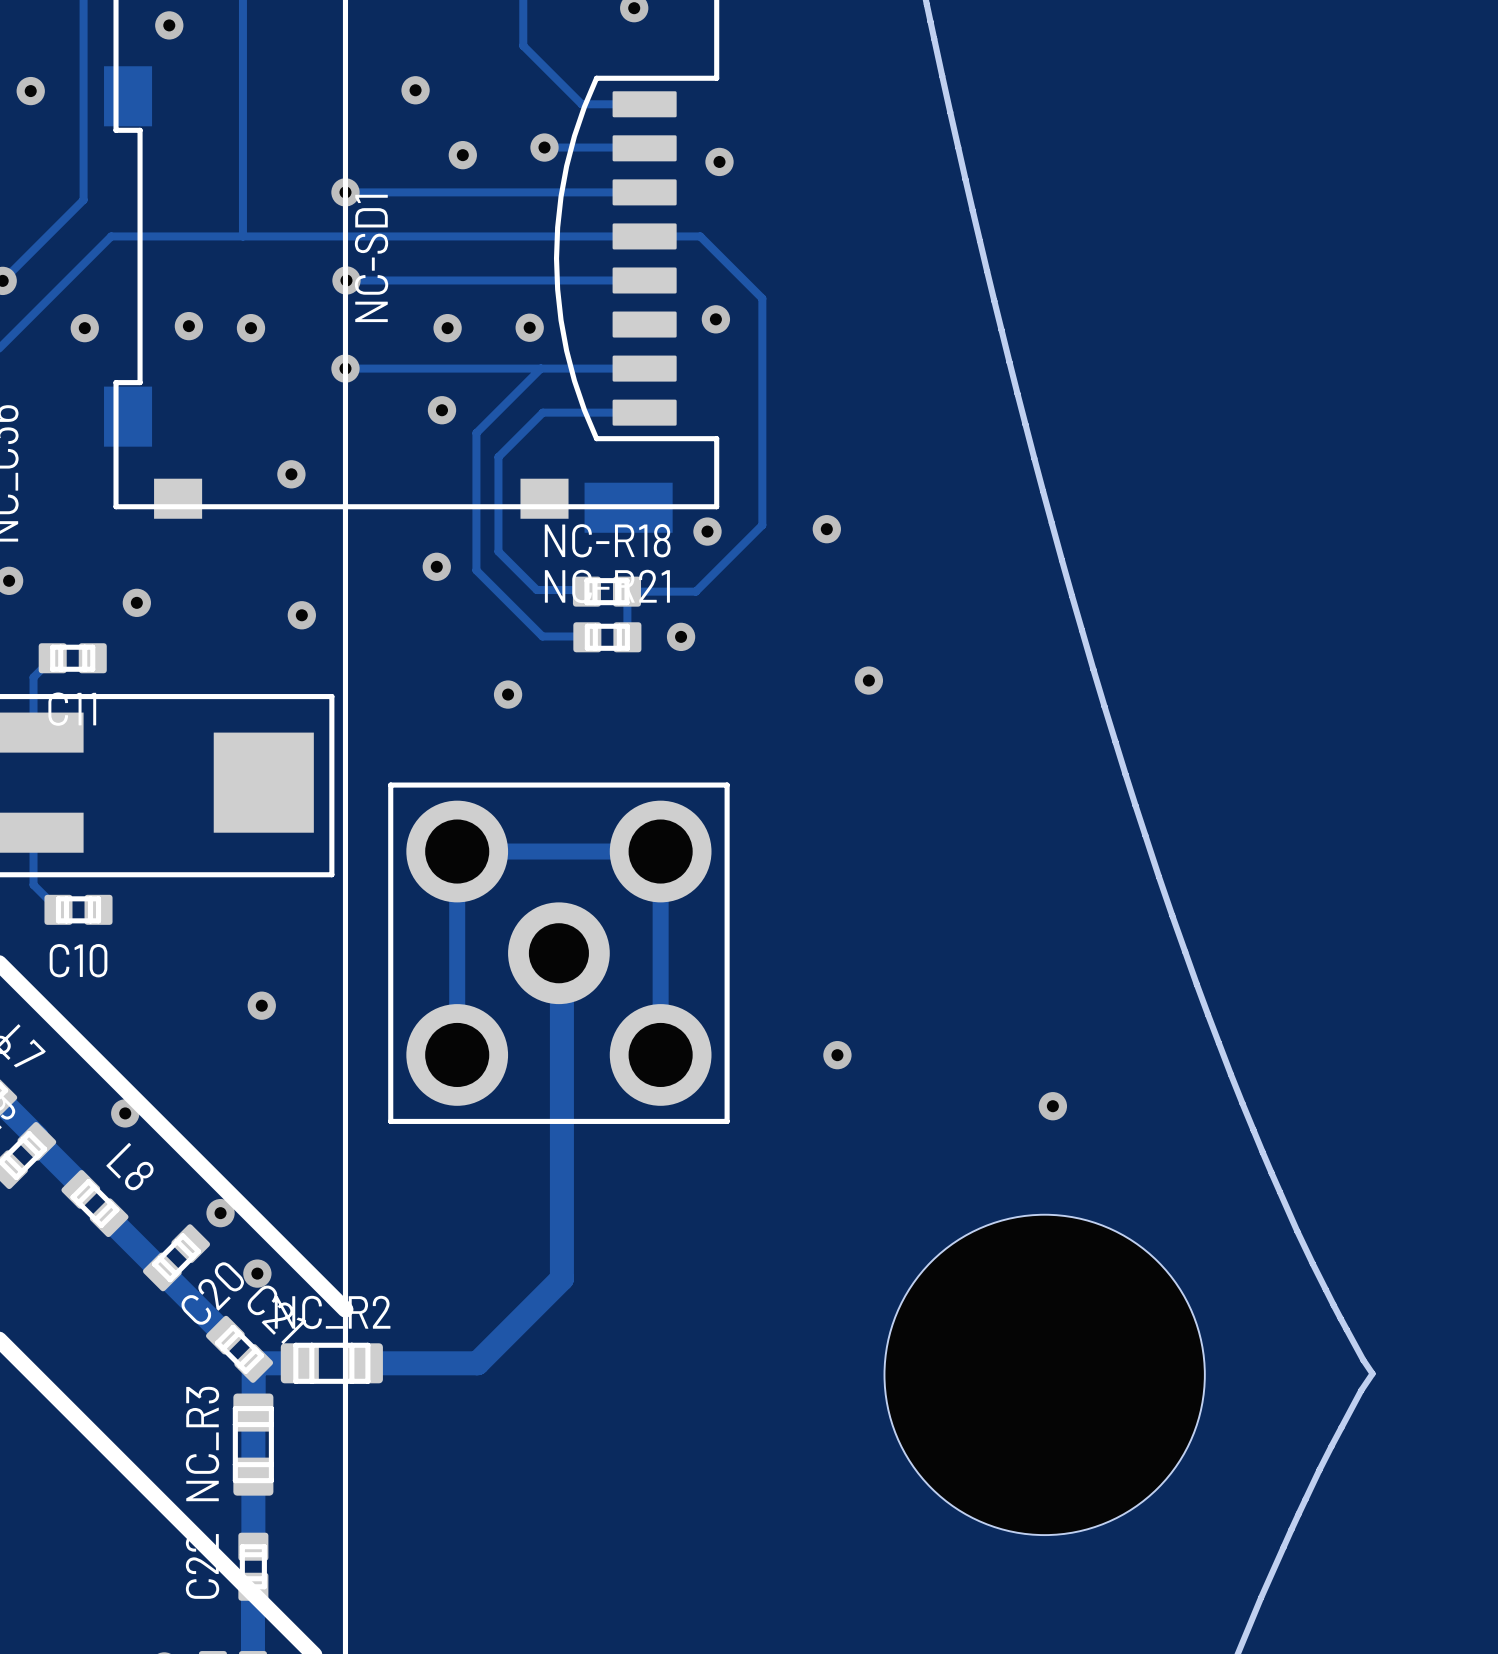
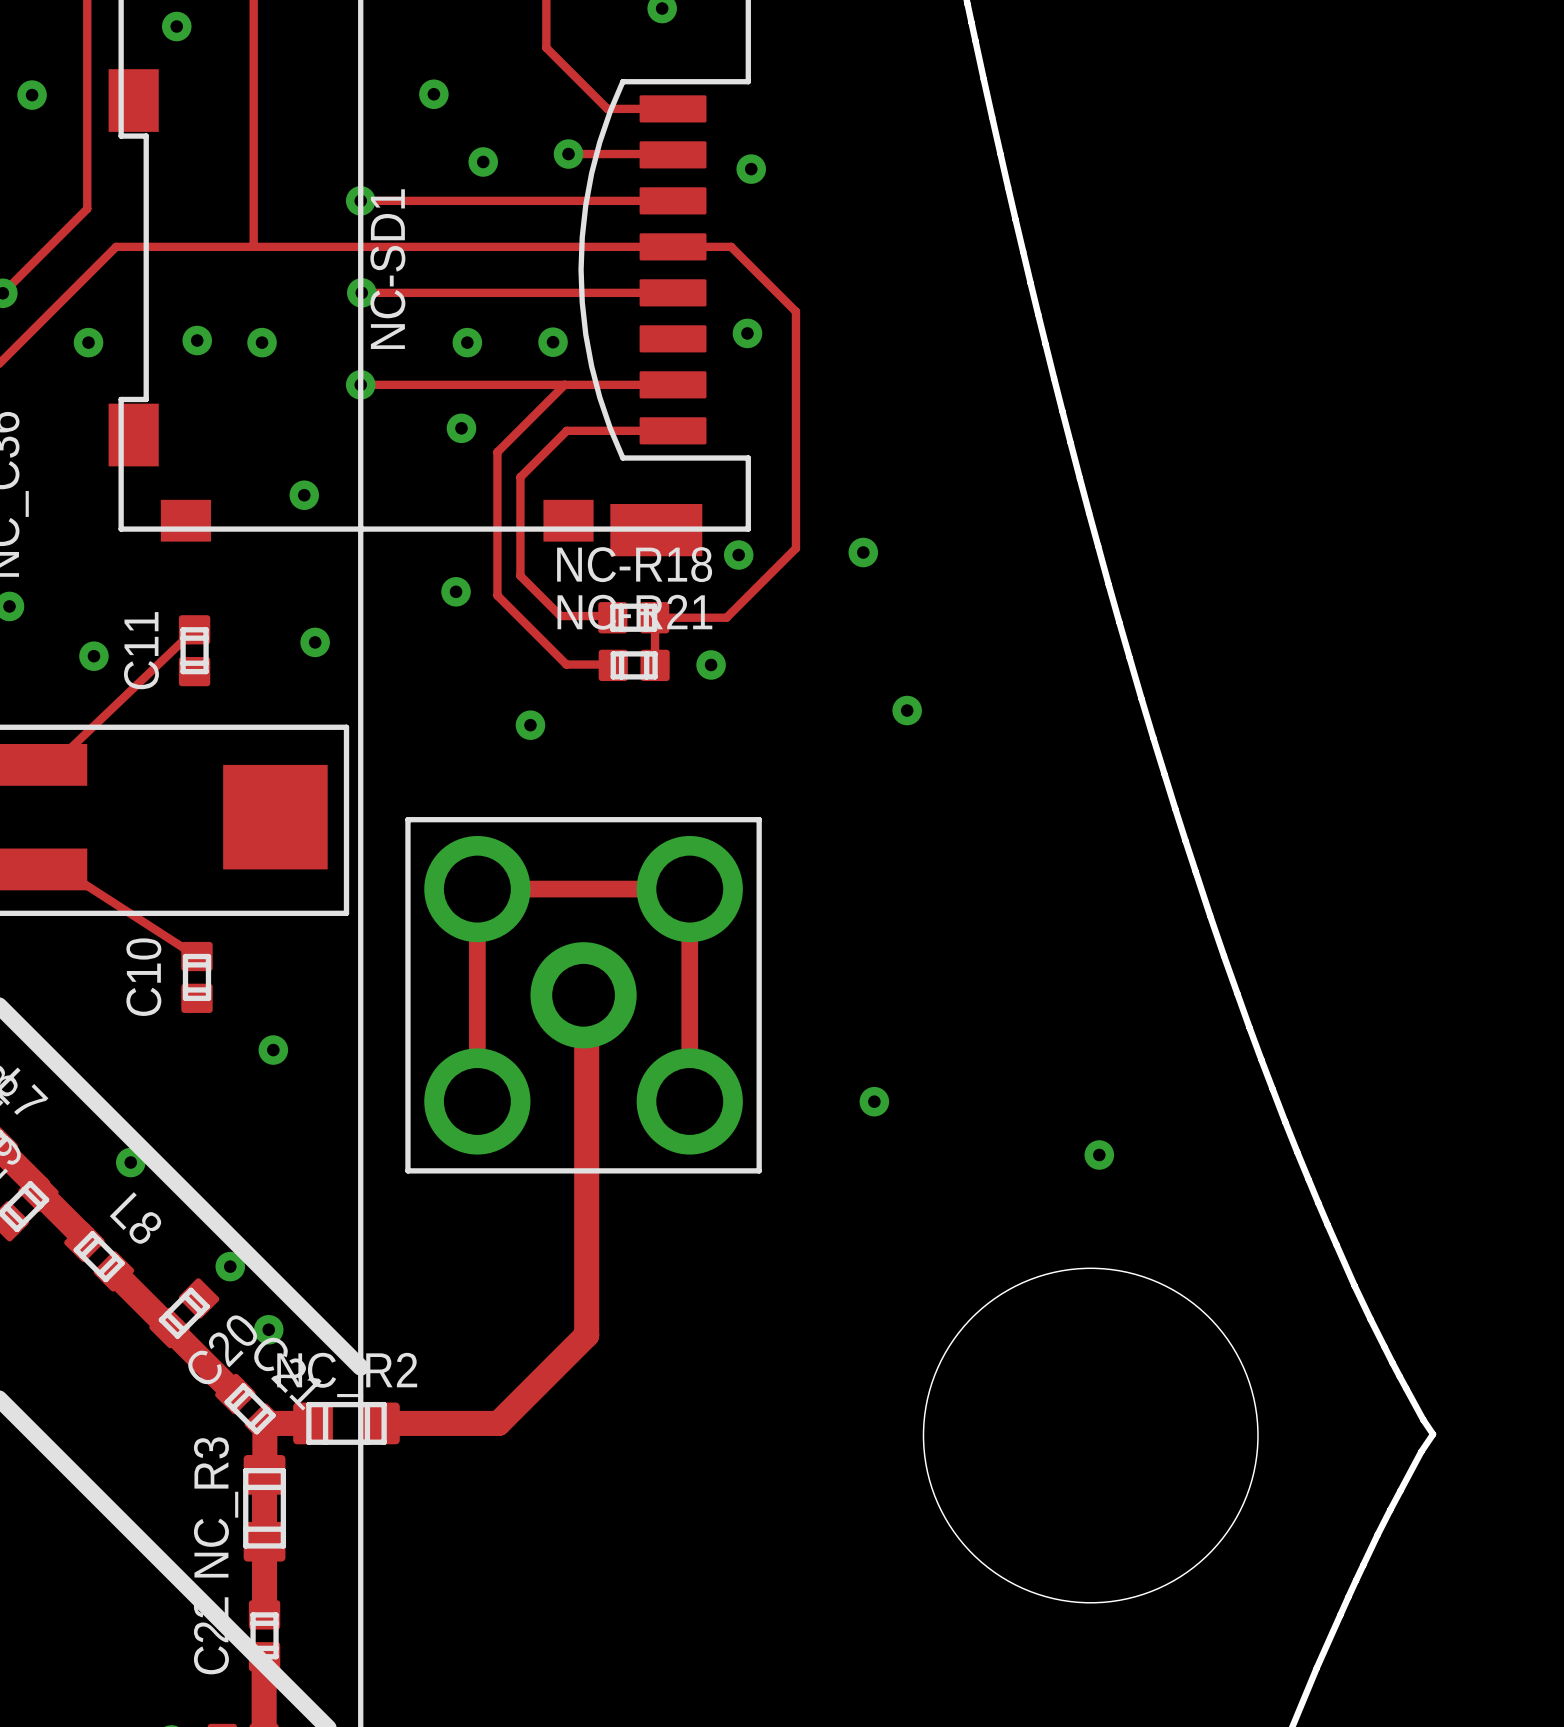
via position: (136, 602) -> (93, 656)
track: (52, 658) (33, 677) (33, 732) -> (194, 629) (53, 764) (34, 765)
C11 rotation: 0° (72, 658) -> 90° clockwise (194, 650)
C11 position: (72, 658) -> (194, 650)
track: (33, 832) (33, 884) (58, 909) -> (35, 869) (61, 869) (196, 956)
C10 rotation: 0° (78, 909) -> 90° clockwise (196, 977)
C10 position: (78, 909) -> (196, 977)

